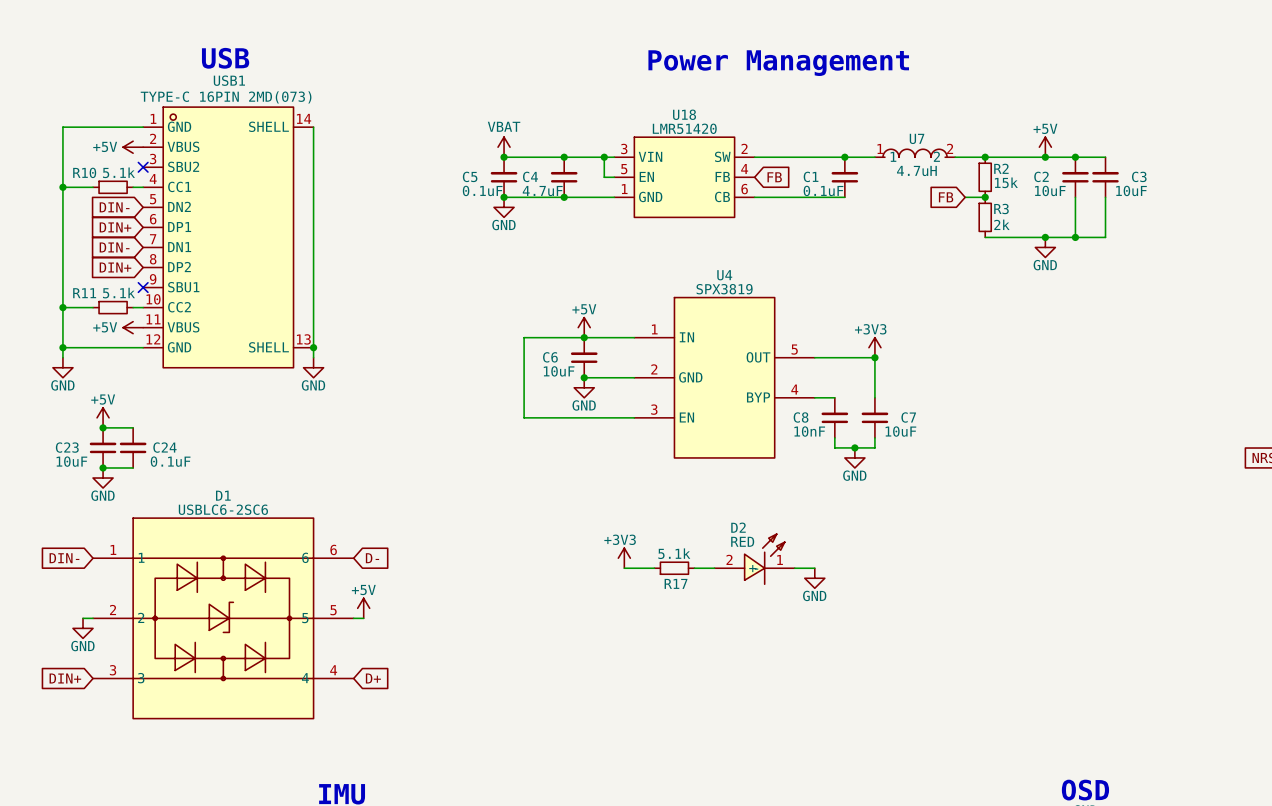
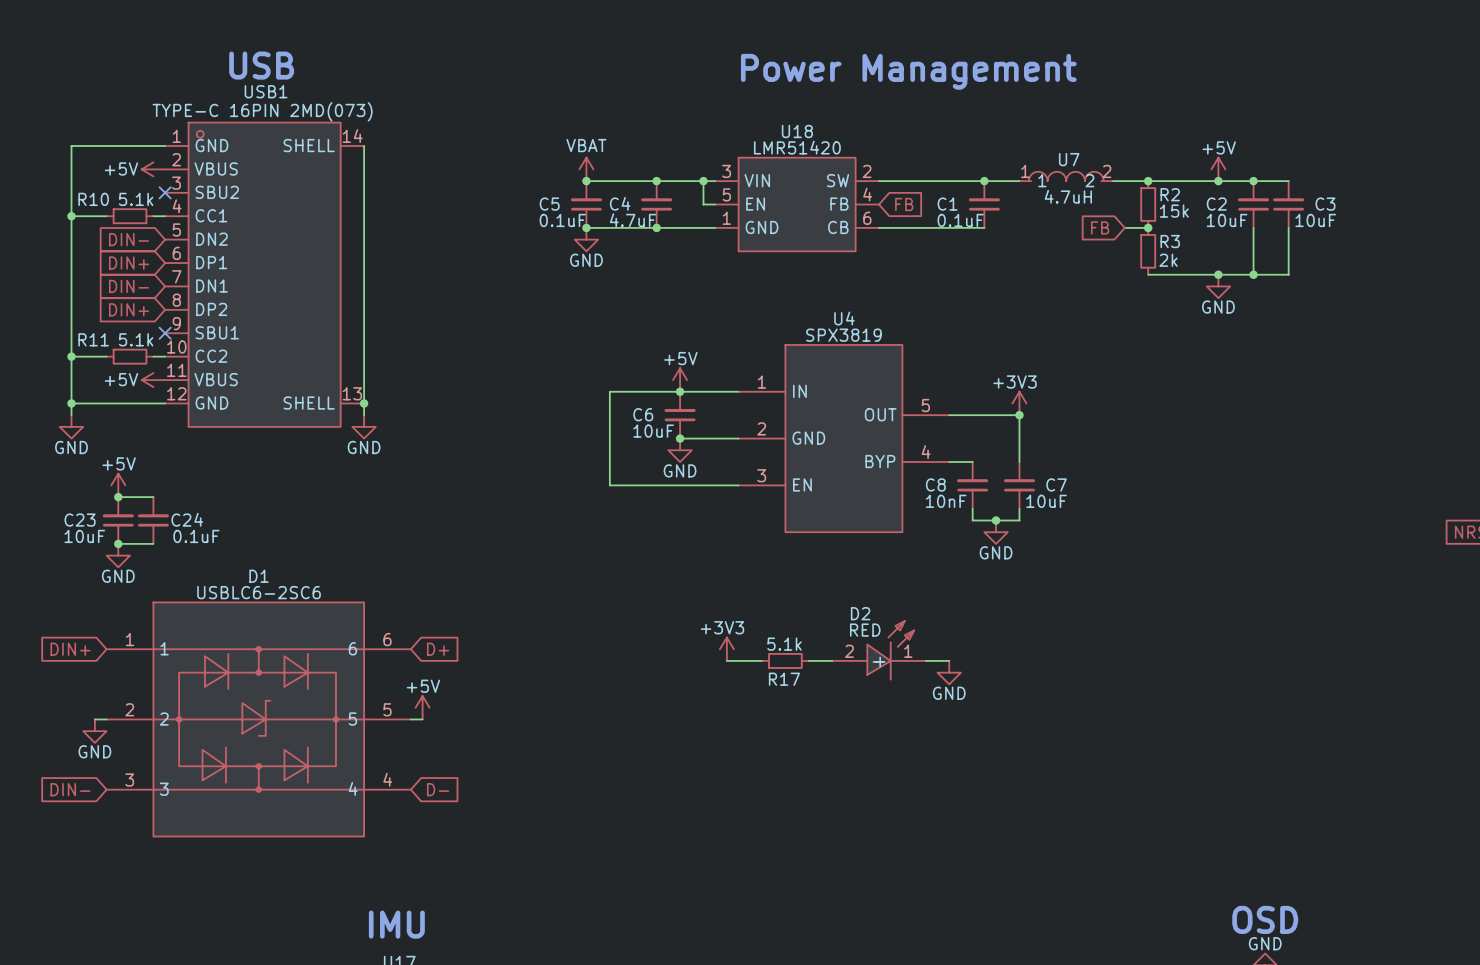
global label: DIN- (64, 558) -> DIN+ (70, 649)
global label: D- (372, 558) -> D+ (438, 649)
global label: DIN+ (65, 678) -> DIN- (70, 789)
global label: D+ (373, 678) -> D- (438, 789)

